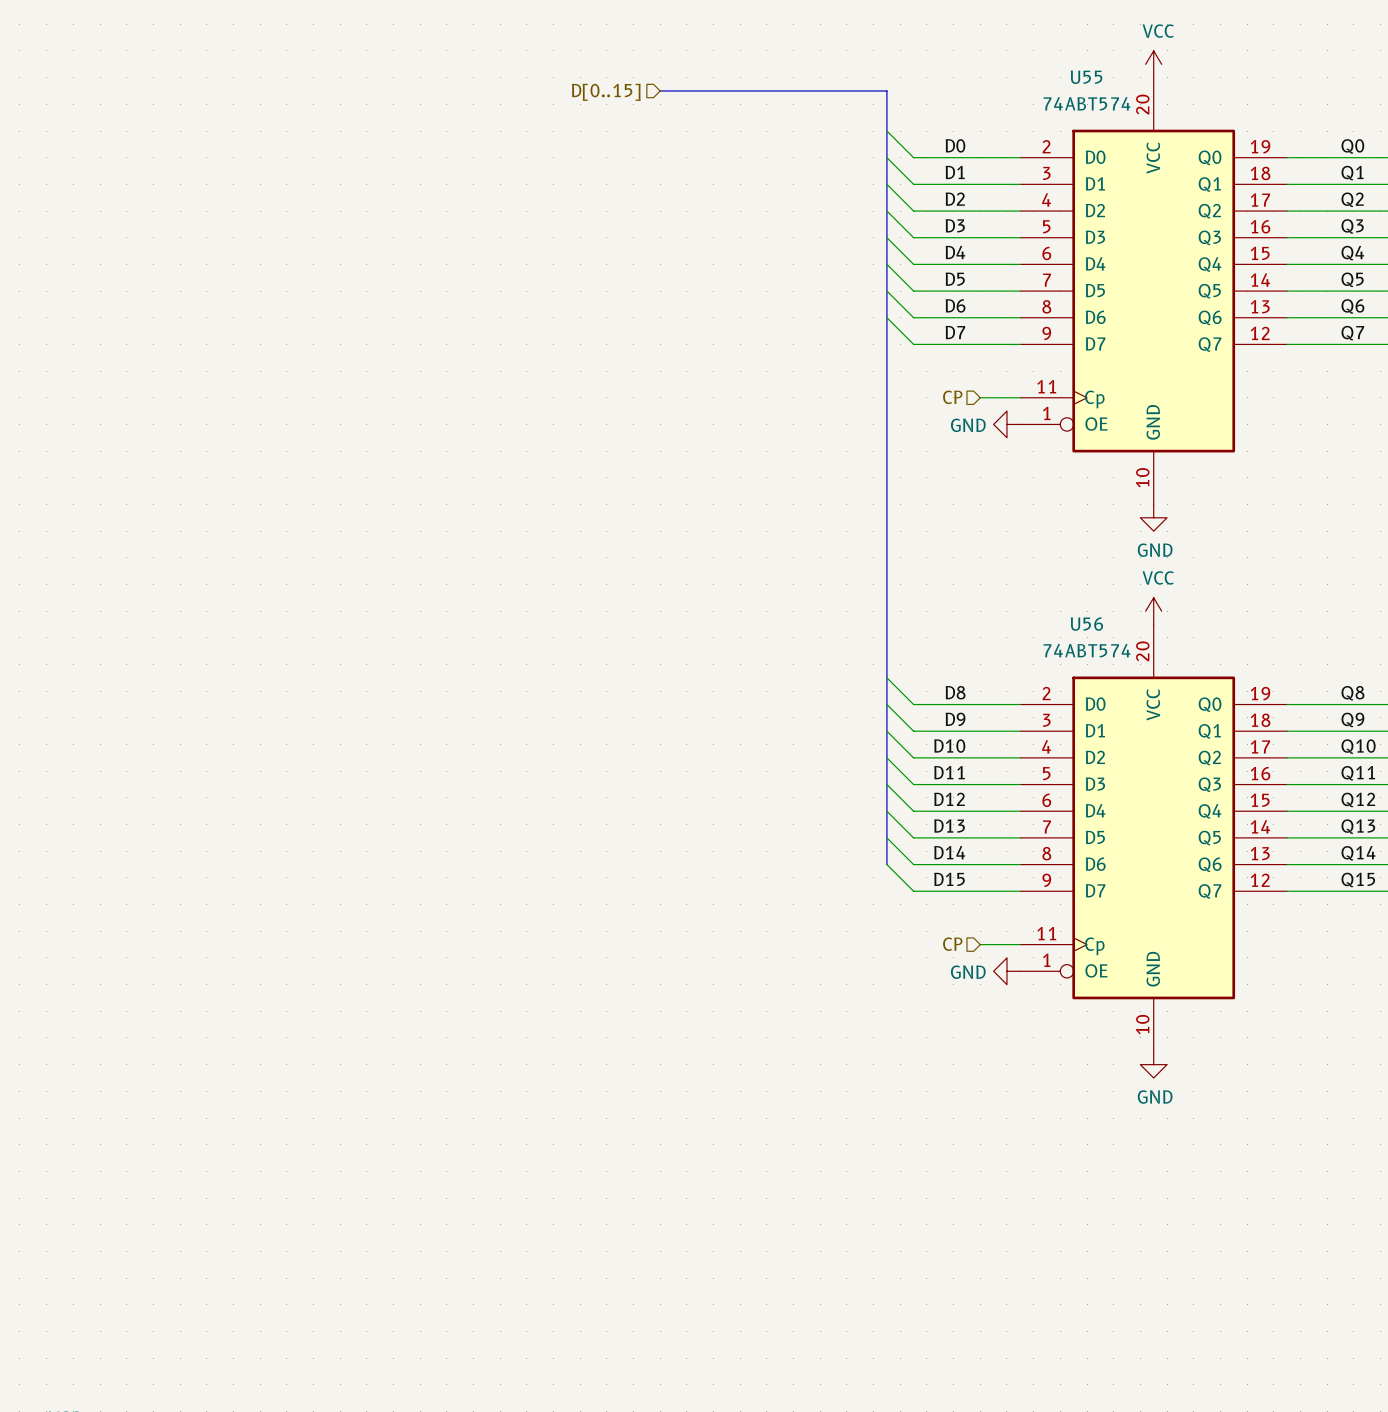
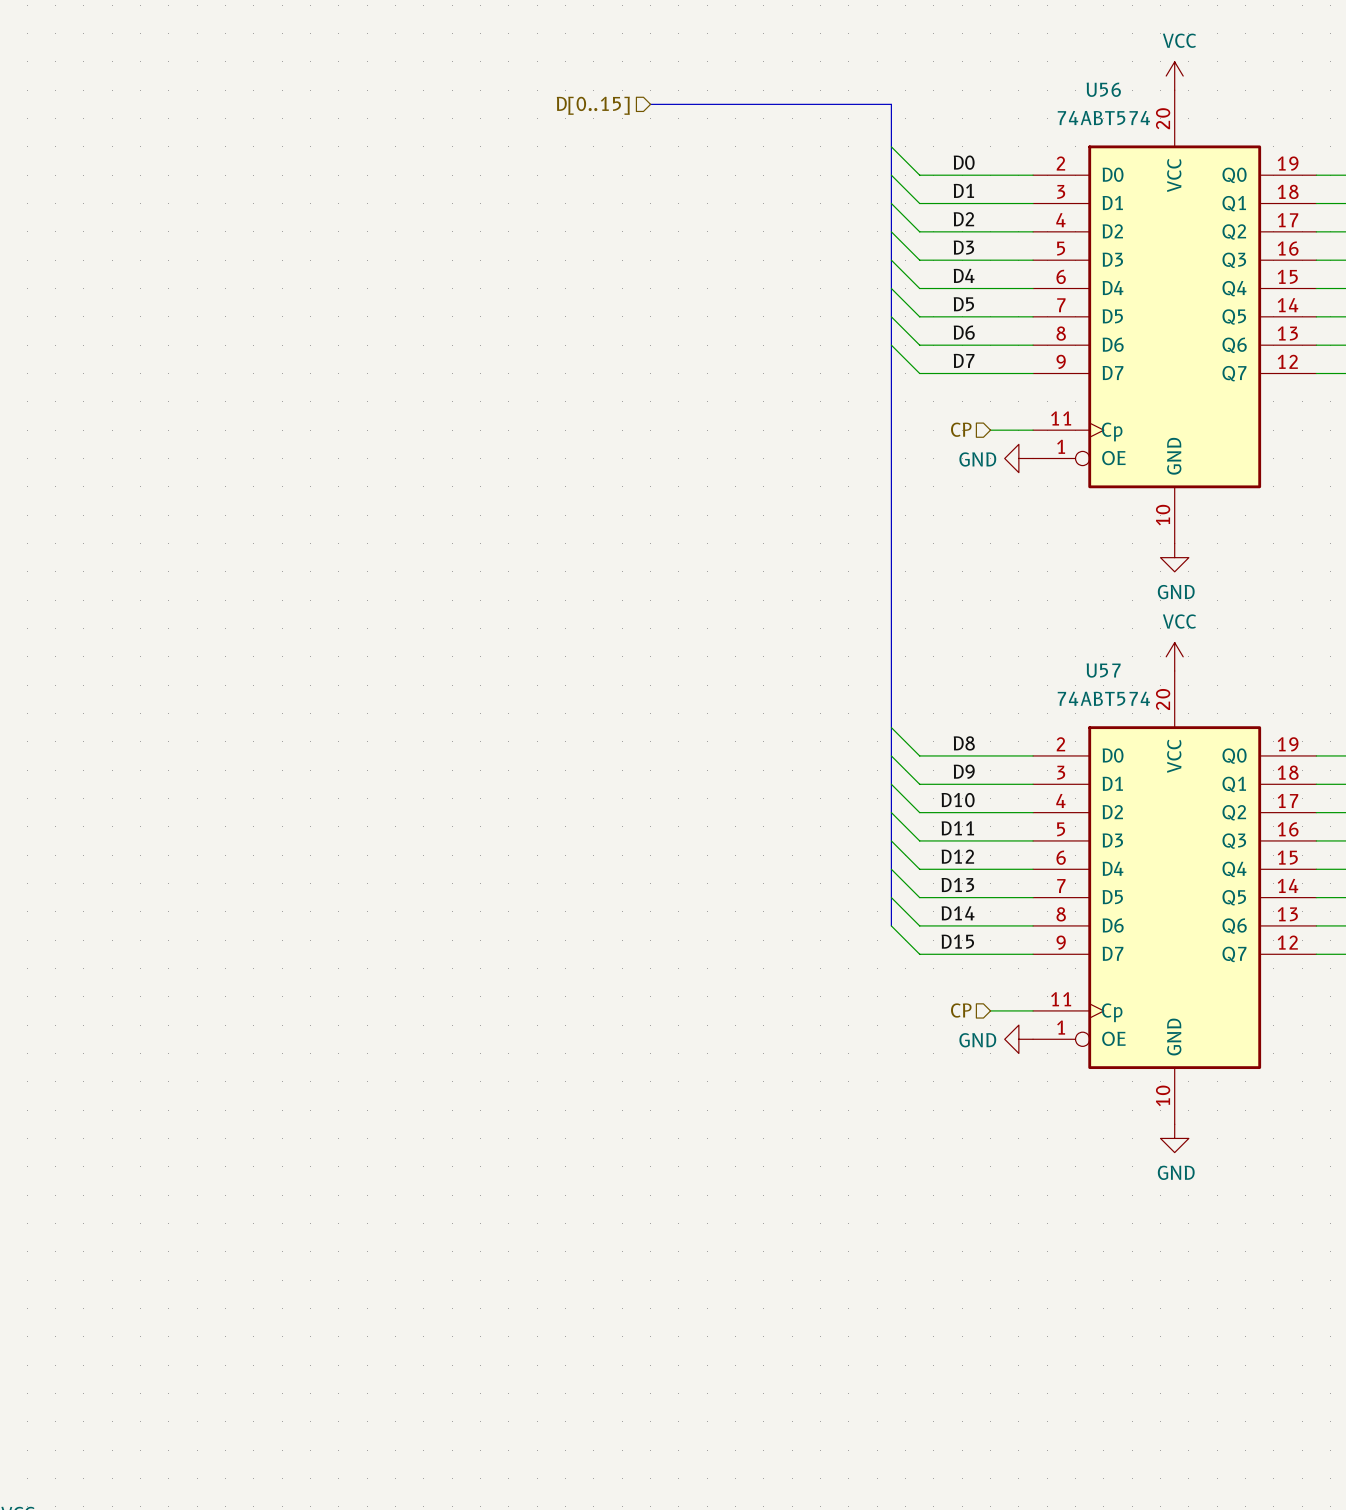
U55 name: U55 (1086, 77) -> U56 (1103, 89)
U56 name: U56 (1086, 624) -> U57 (1103, 670)

